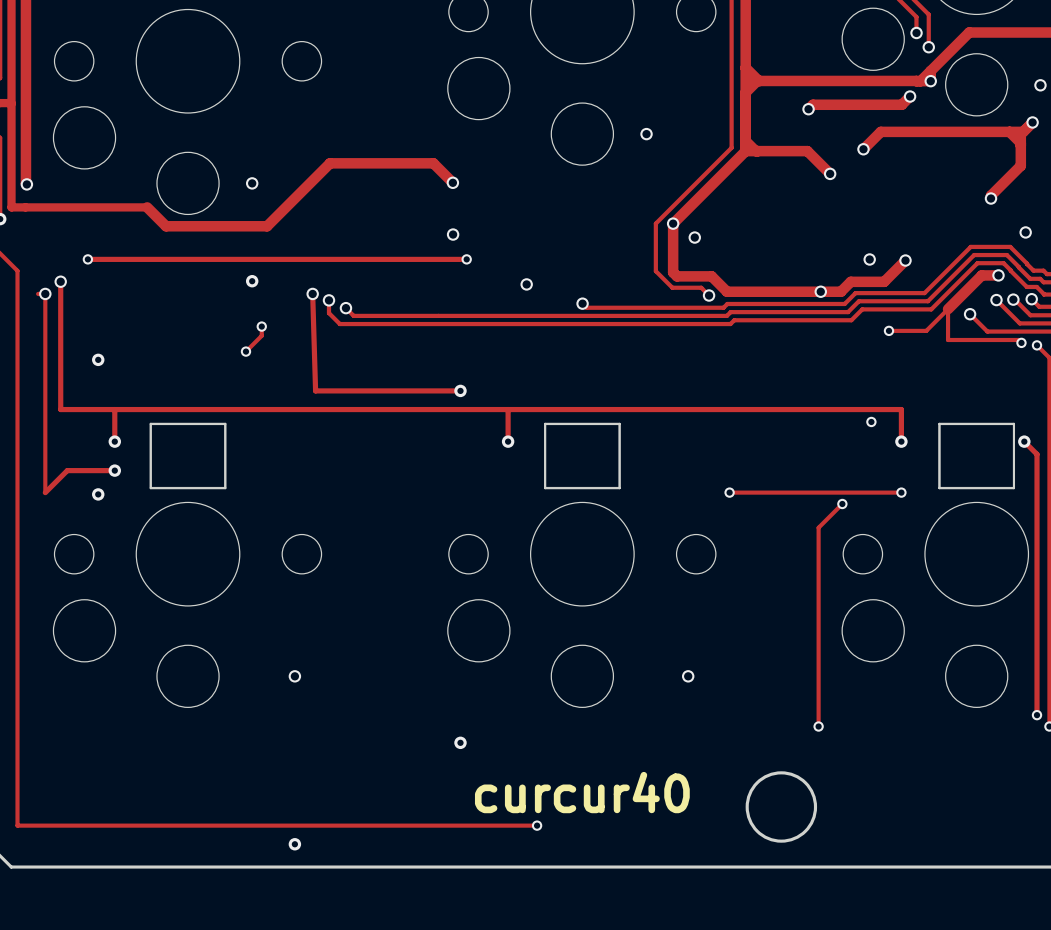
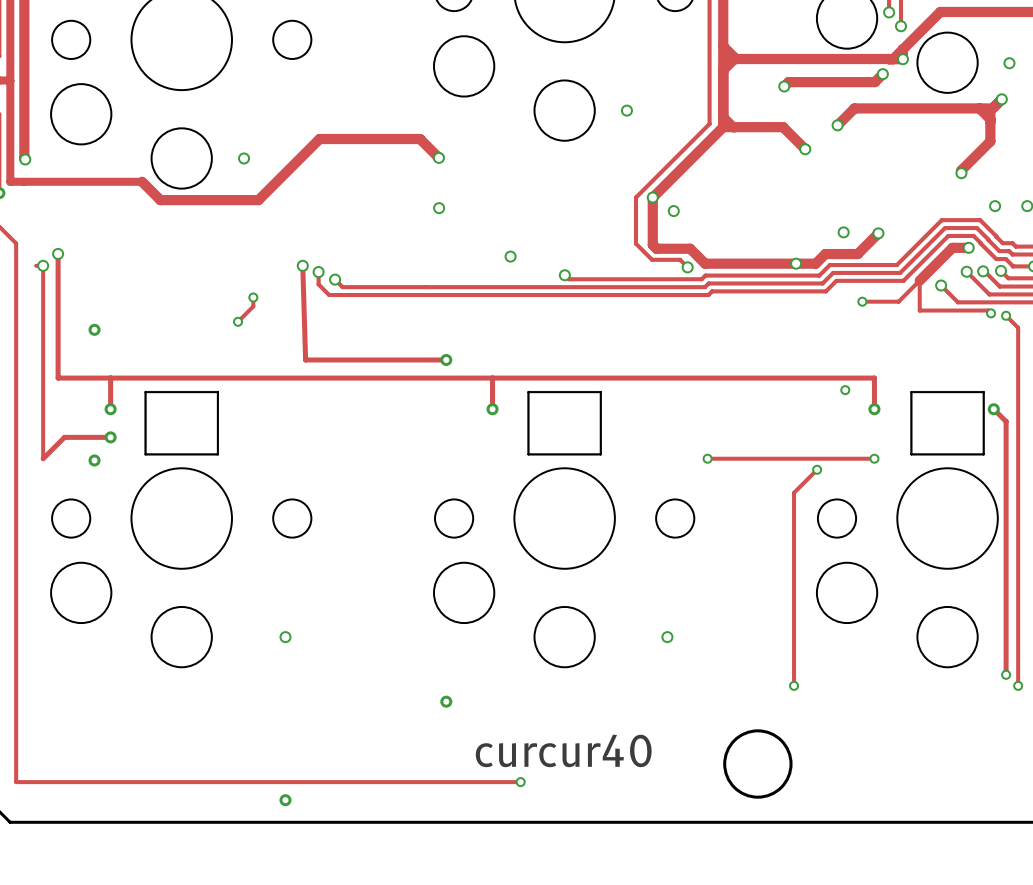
track: (87, 259) (466, 259) -> none
via: (87, 259) -> none
via: (466, 259) -> none
via: (252, 281) -> none

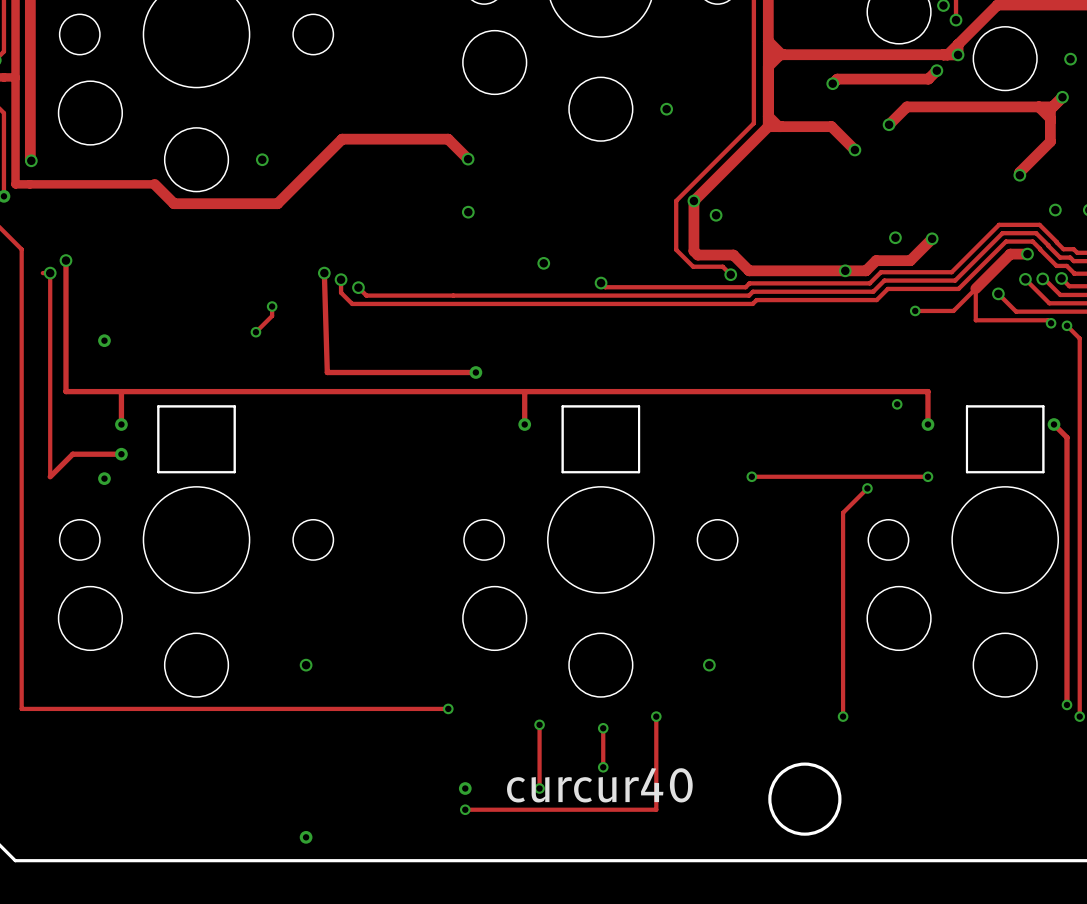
track: (16, 678) (16, 782) (520, 782) -> (21, 708) (448, 708)
via: none -> (448, 708)
track: none -> (656, 716) (656, 809) (465, 809)
via: none -> (656, 716)
track: none -> (539, 724) (539, 788)
via: none -> (539, 724)
track: none -> (603, 728) (603, 767)
via: none -> (603, 728)
via position: (446, 701) -> (465, 788)
via: none -> (603, 767)
via: none -> (465, 809)
via position: (520, 782) -> (539, 788)

